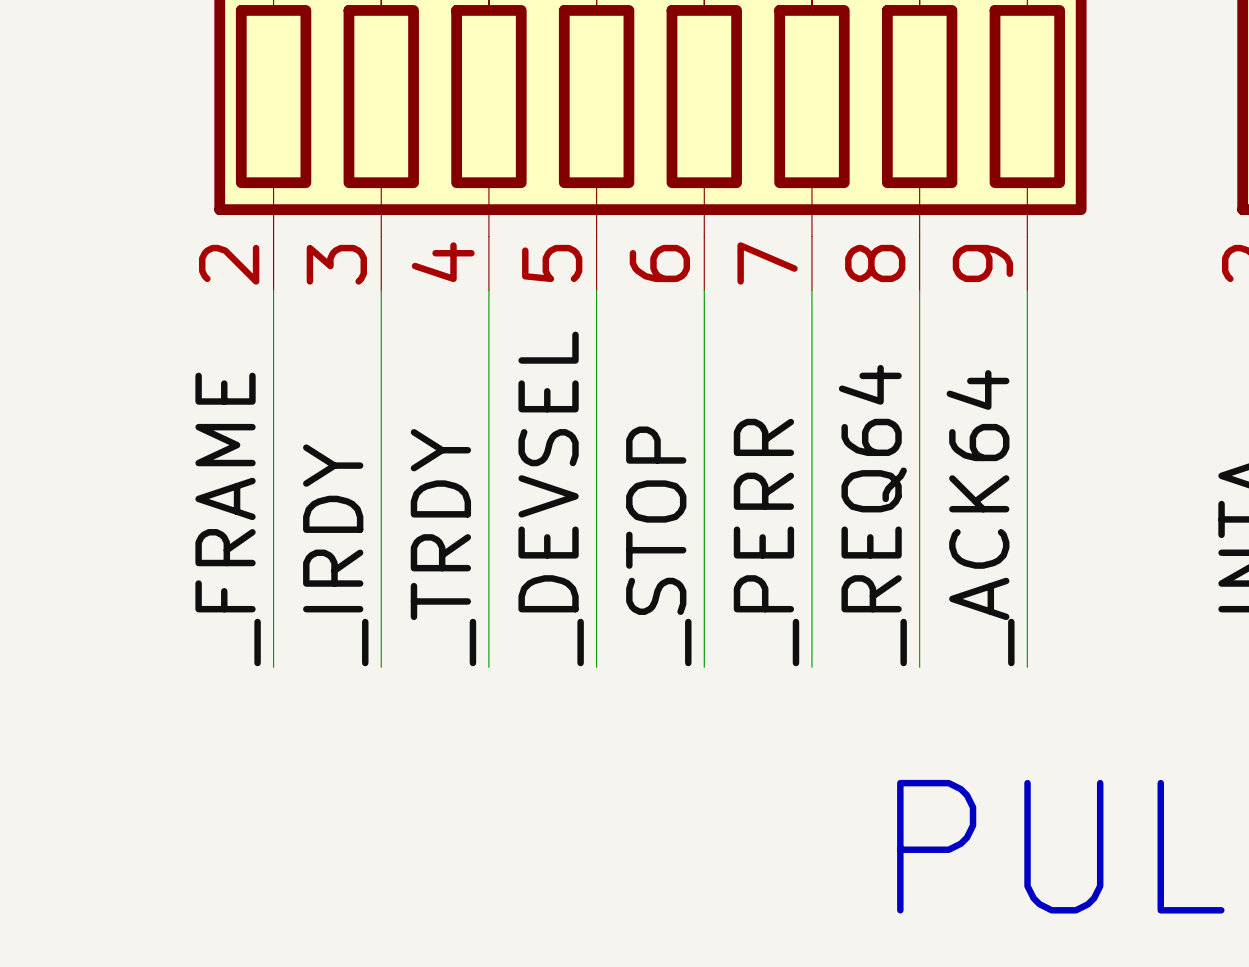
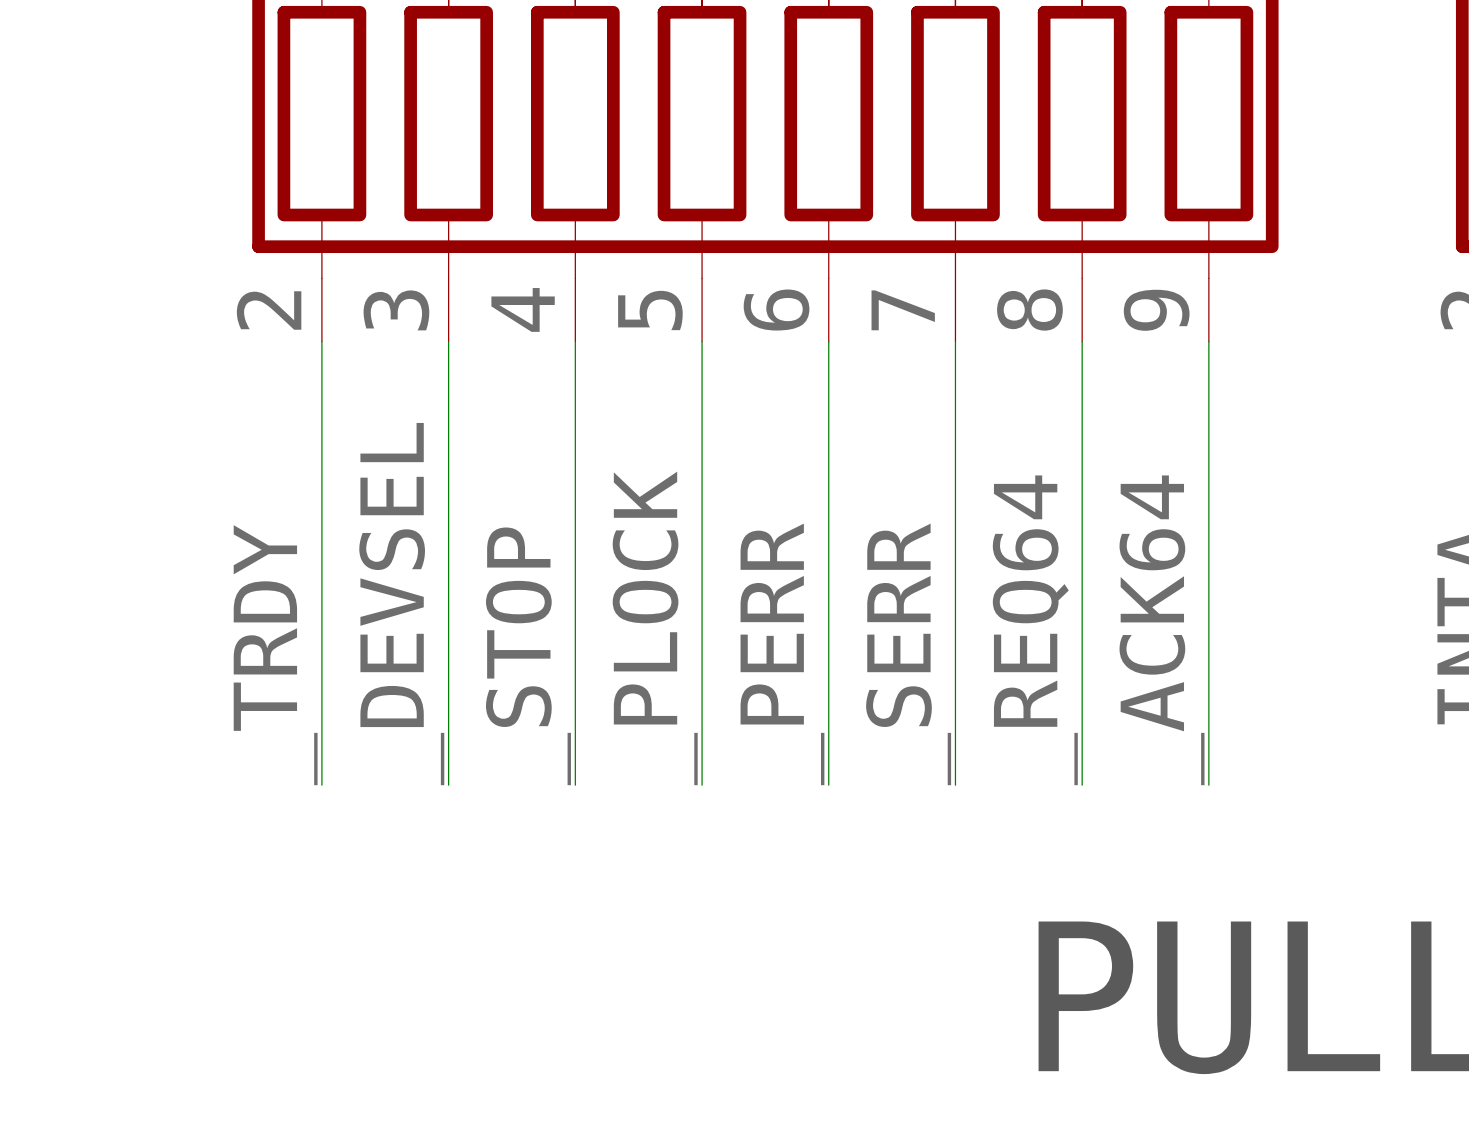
label: _DEVSEL (551, 498) -> _PLOCK (655, 628)
label: _FRAME (228, 519) -> _TRDY (275, 655)
label: _PERR (766, 542) -> _SERR (908, 654)
label: _STOP (658, 546) -> _PERR (782, 654)
label: _TRDY (443, 547) -> _STOP (528, 656)
label: _IRDY (335, 555) -> _DEVSEL (401, 604)

